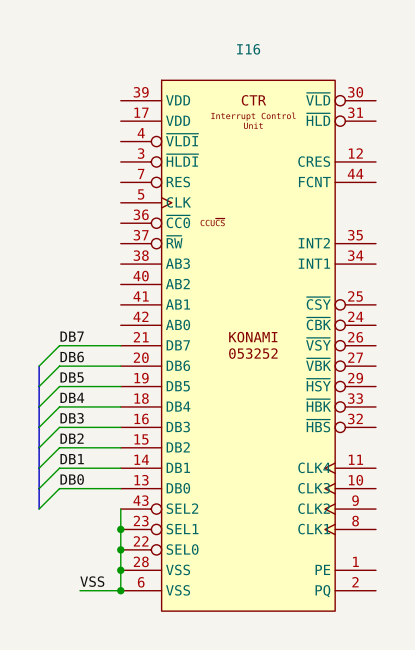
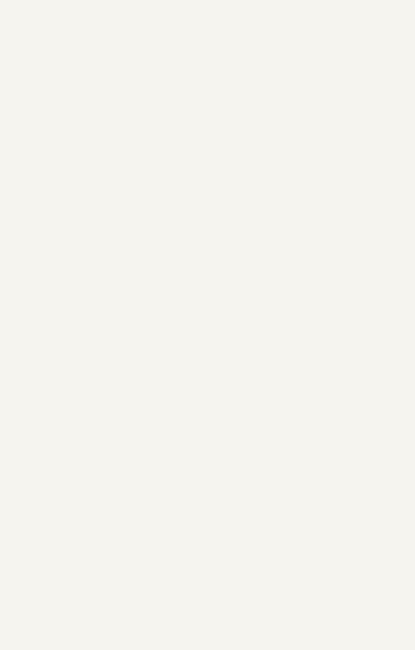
label: DB7 (72, 336) -> none
wire: (120, 345) (59, 345) (39, 366) -> none
I16: (248, 345) -> none
label: DB6 (72, 357) -> none
bus: (39, 366) (39, 509) -> none
wire: (120, 366) (59, 366) (39, 386) -> none
label: DB5 (72, 377) -> none
wire: (120, 386) (59, 386) (39, 406) -> none
label: DB4 (72, 397) -> none
wire: (120, 406) (59, 406) (39, 427) -> none
label: DB3 (72, 418) -> none
wire: (120, 427) (59, 427) (39, 447) -> none
label: DB2 (72, 438) -> none
wire: (120, 447) (59, 447) (39, 468) -> none
label: DB1 (72, 459) -> none
wire: (120, 468) (59, 468) (39, 488) -> none
label: DB0 (72, 479) -> none
wire: (120, 488) (59, 488) (39, 509) -> none
wire: (120, 509) (120, 590) (79, 590) -> none
junction: (120, 529) -> none
junction: (120, 549) -> none
junction: (120, 570) -> none
label: VSS (92, 581) -> none
junction: (120, 590) -> none

